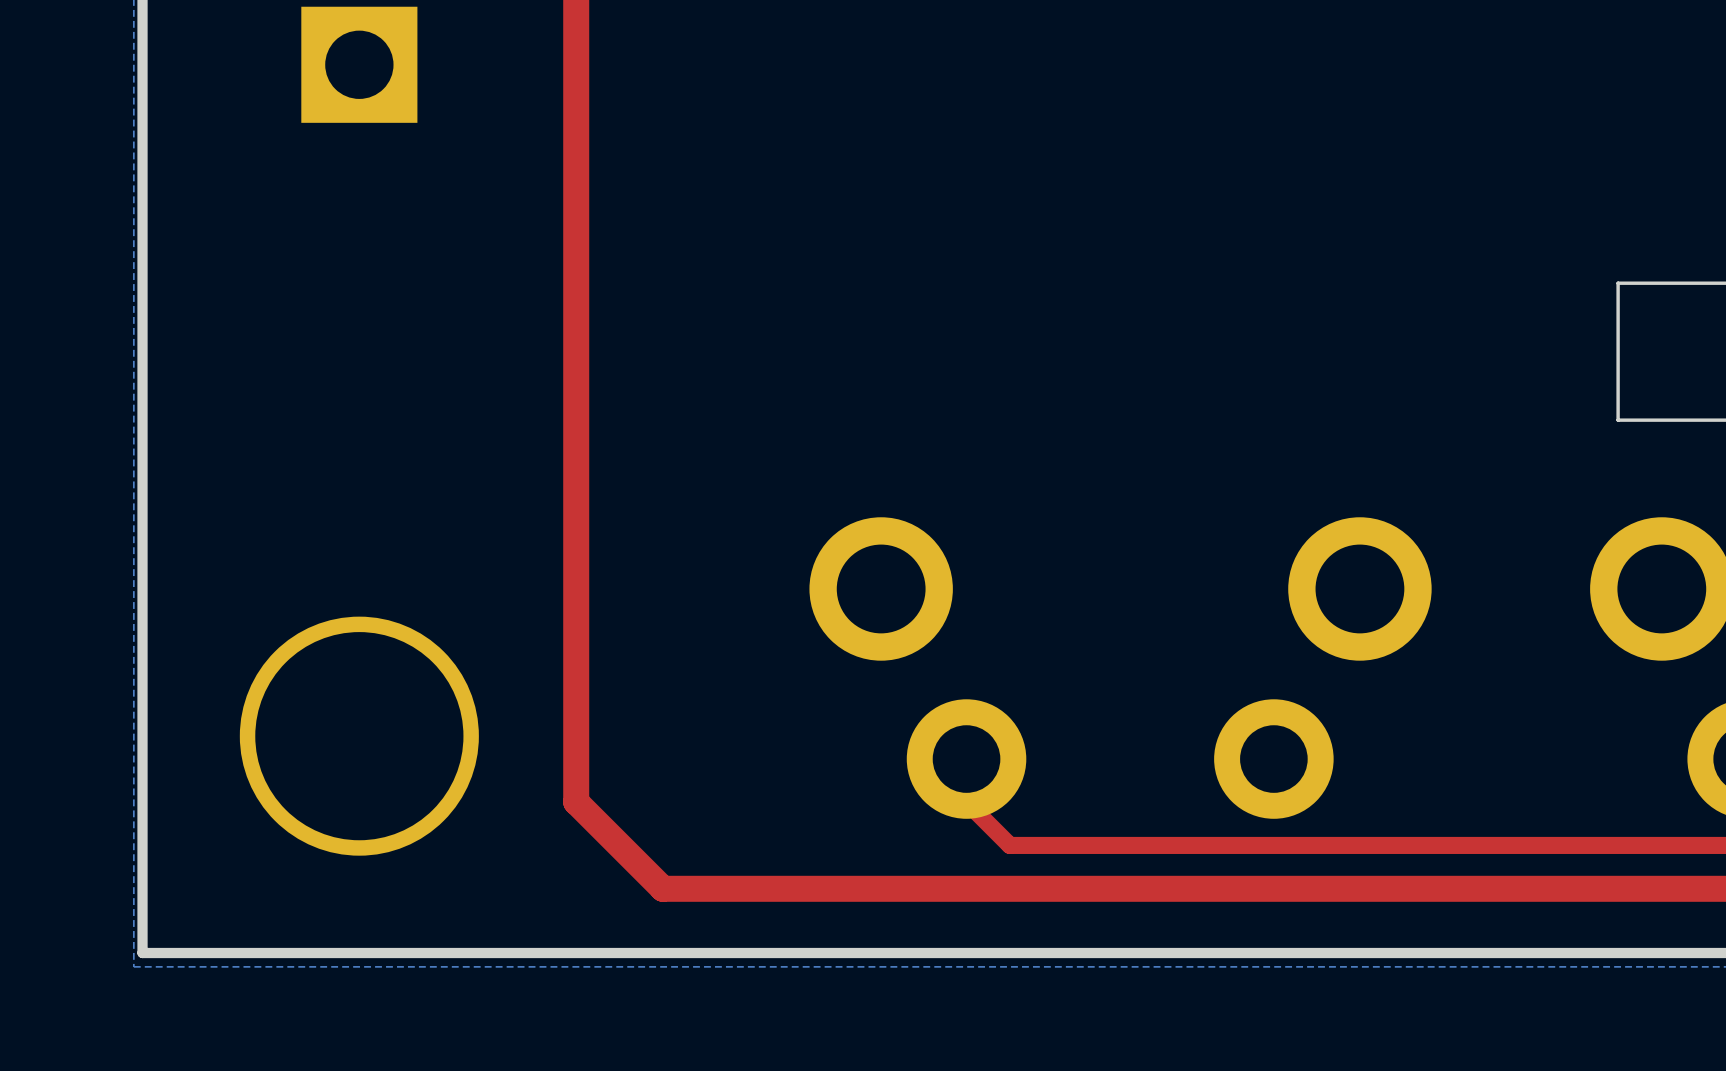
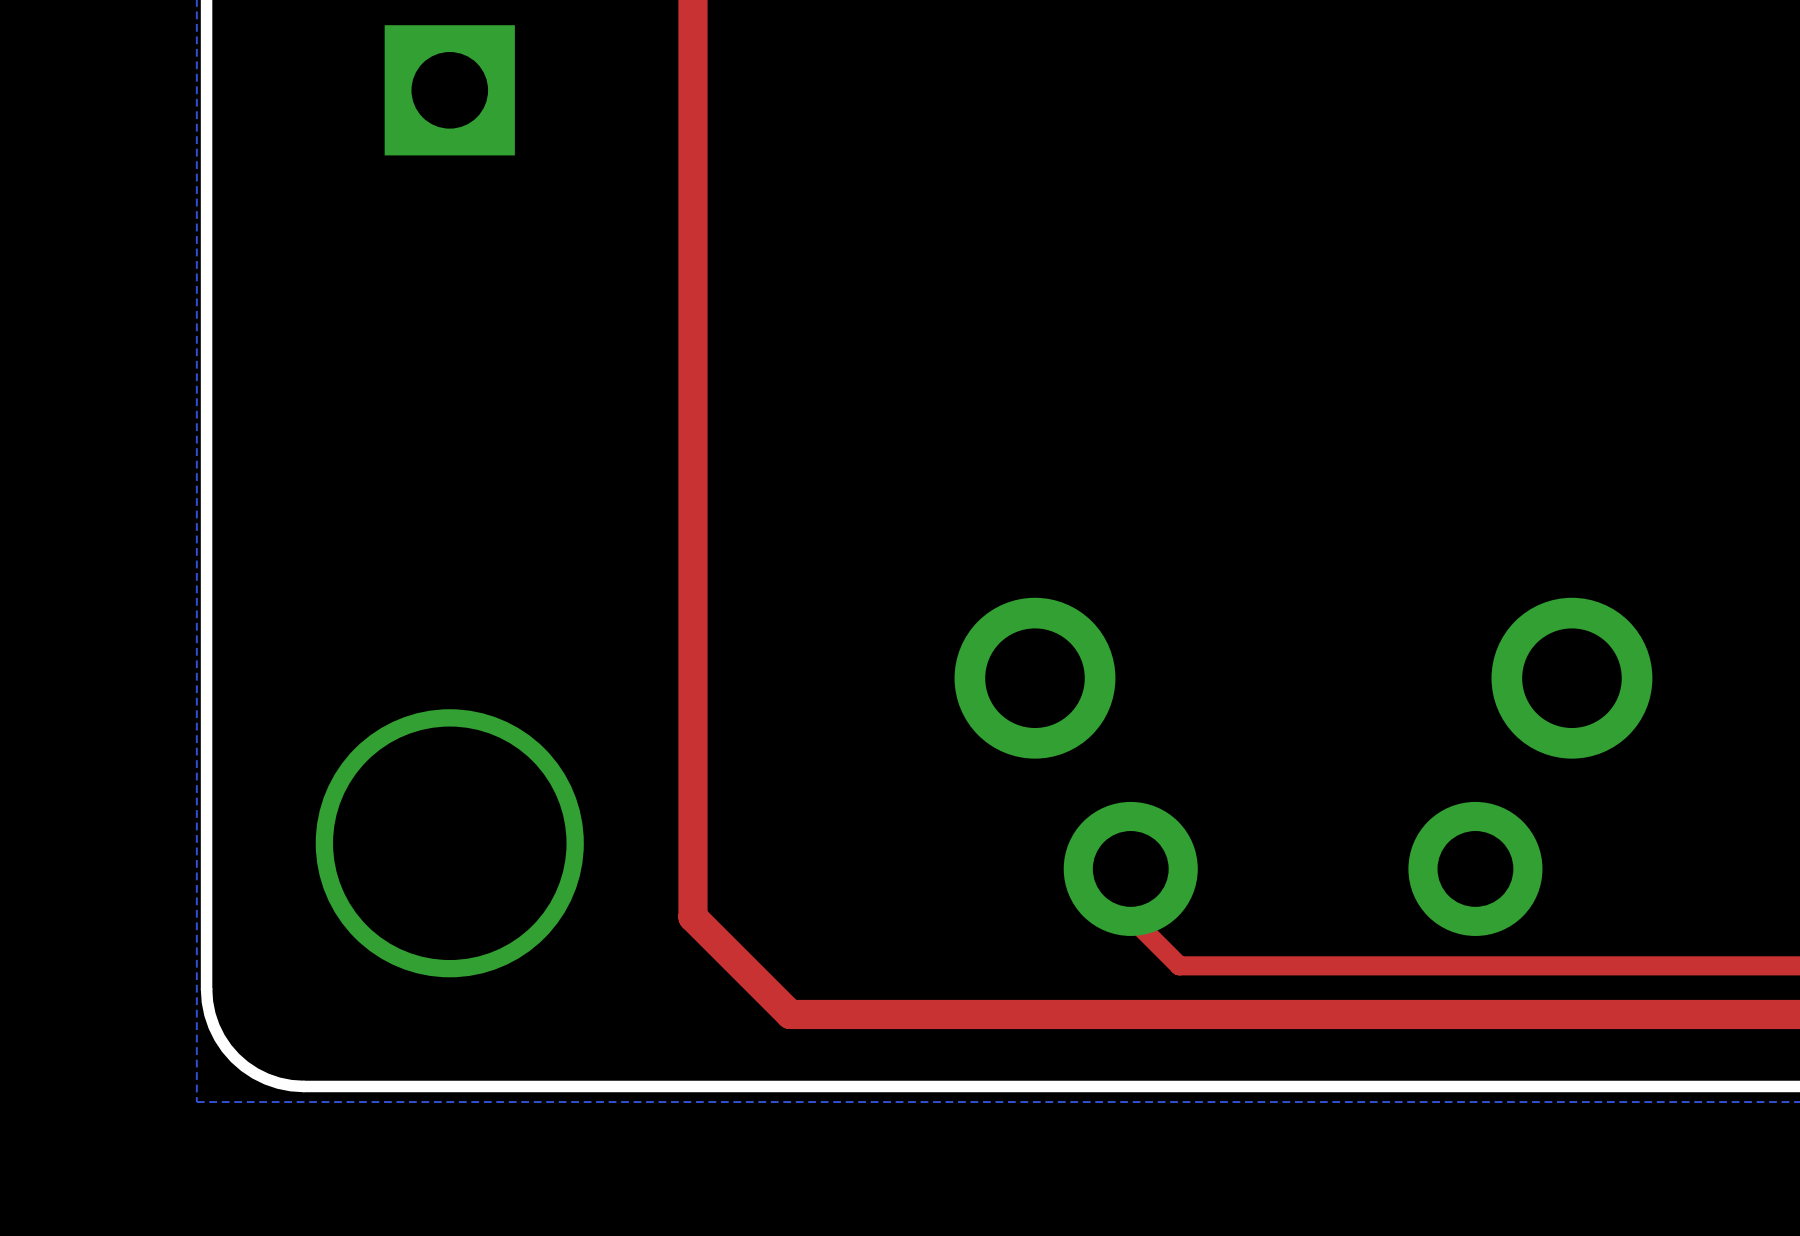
board edge: (142, 866) (142, 953) (229, 953) -> (206, 989) (209, 1014) (213, 1026) (226, 1048) (235, 1057) (255, 1073) (266, 1079) (278, 1083) (303, 1086)

